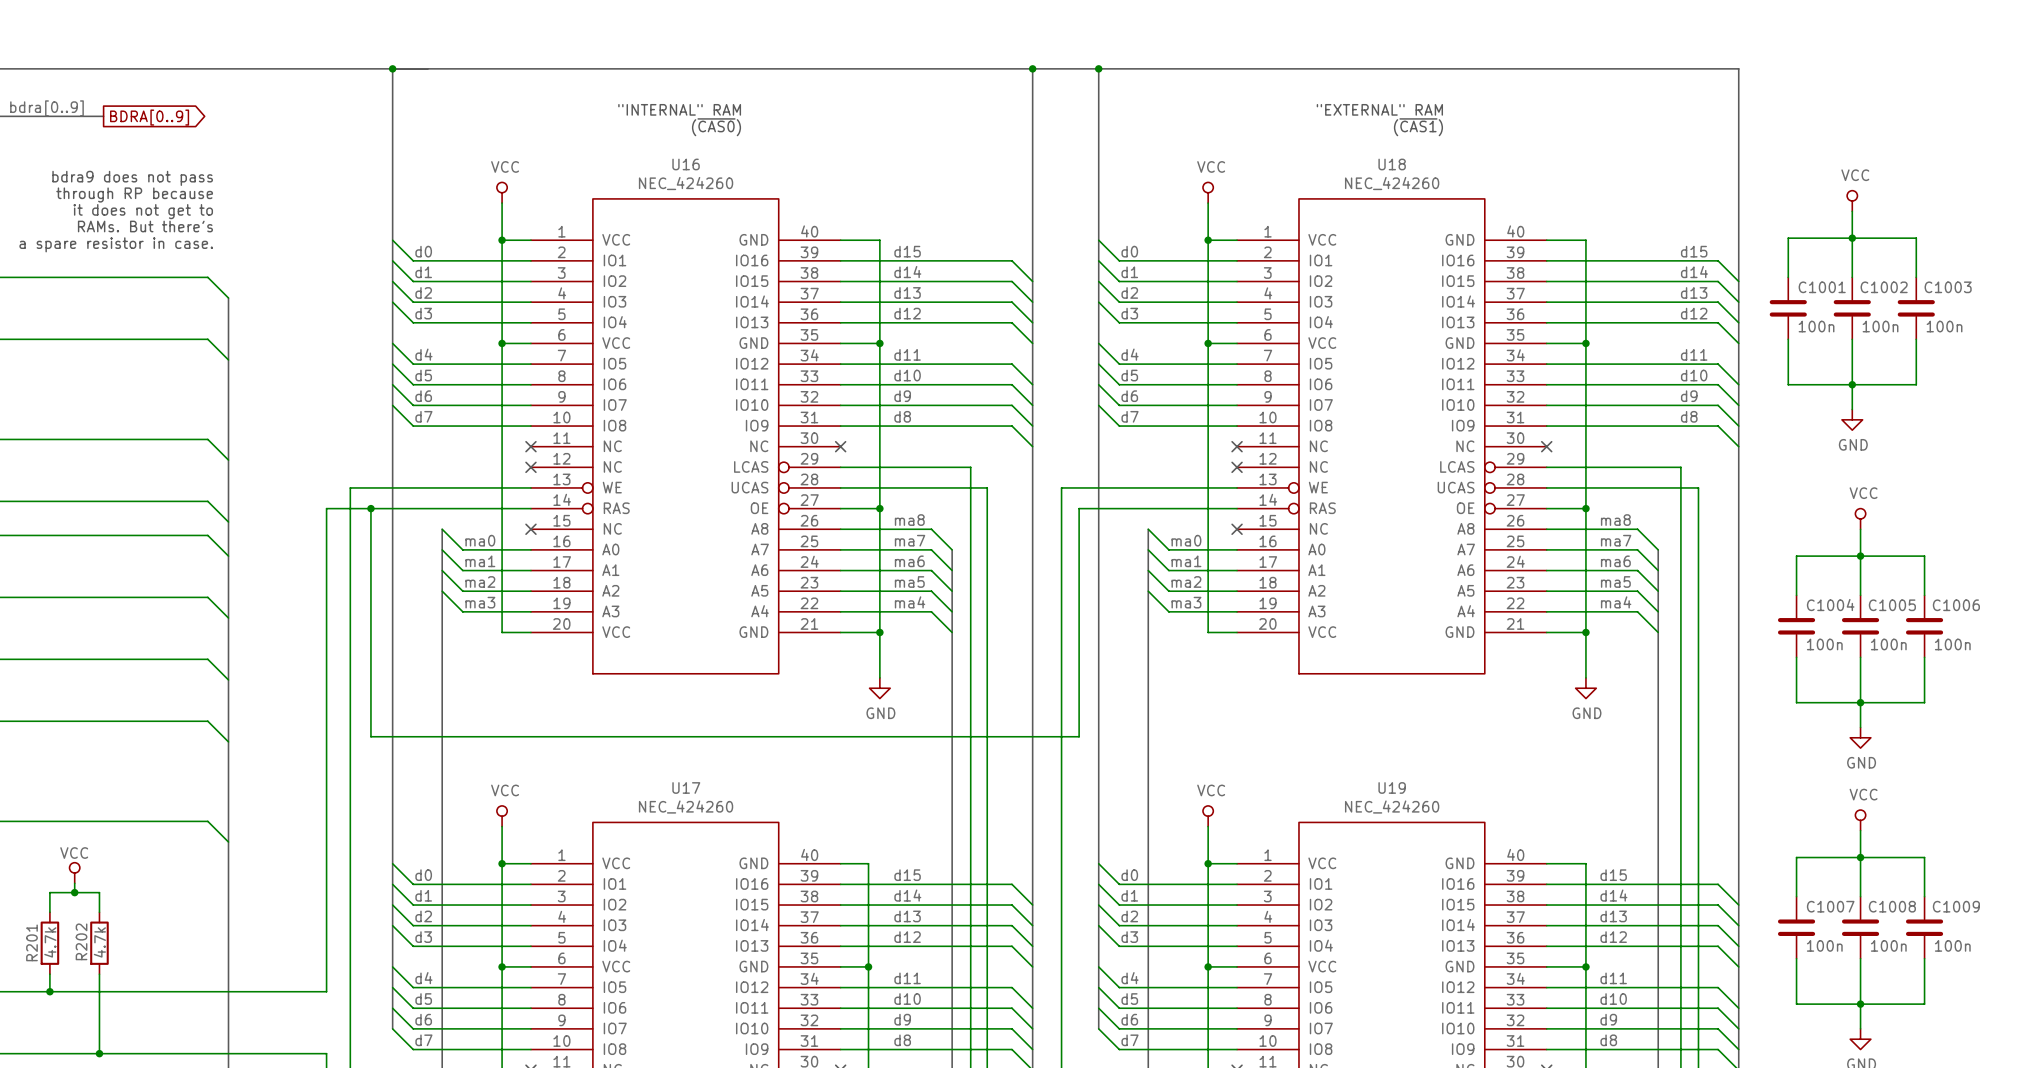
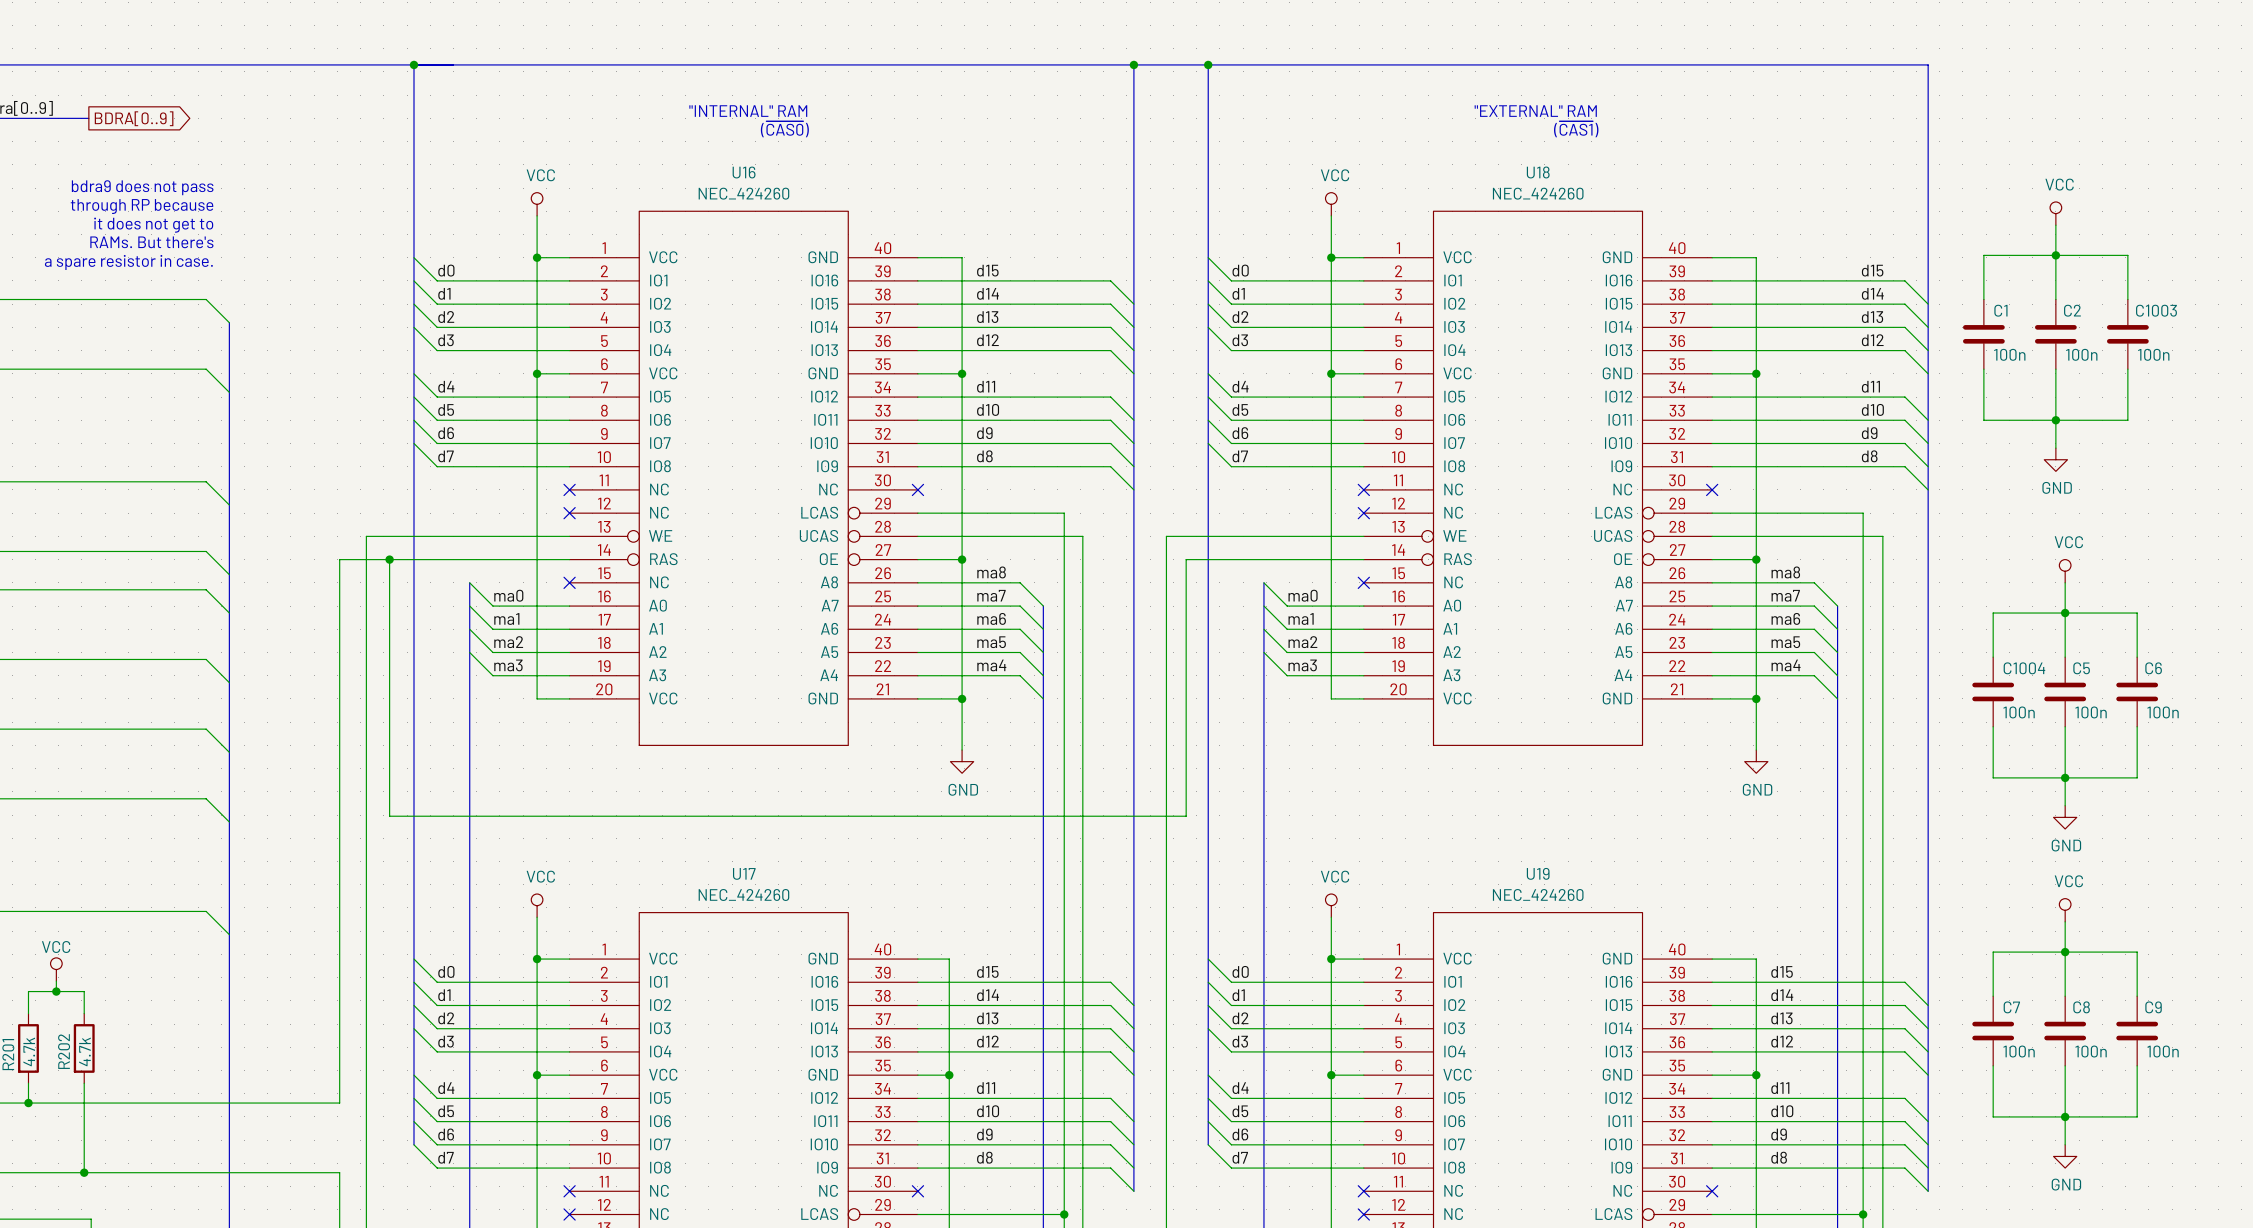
C1001 name: C1001 (1822, 287) -> C1 (2000, 310)
C1002 name: C1002 (1884, 287) -> C2 (2072, 310)
C1005 name: C1005 (1892, 605) -> C5 (2081, 668)
C1006 name: C1006 (1956, 605) -> C6 (2153, 668)
C1007 name: C1007 (1830, 906) -> C7 (2011, 1007)
C1008 name: C1008 (1892, 906) -> C8 (2081, 1007)
C1009 name: C1009 (1956, 906) -> C9 (2153, 1007)

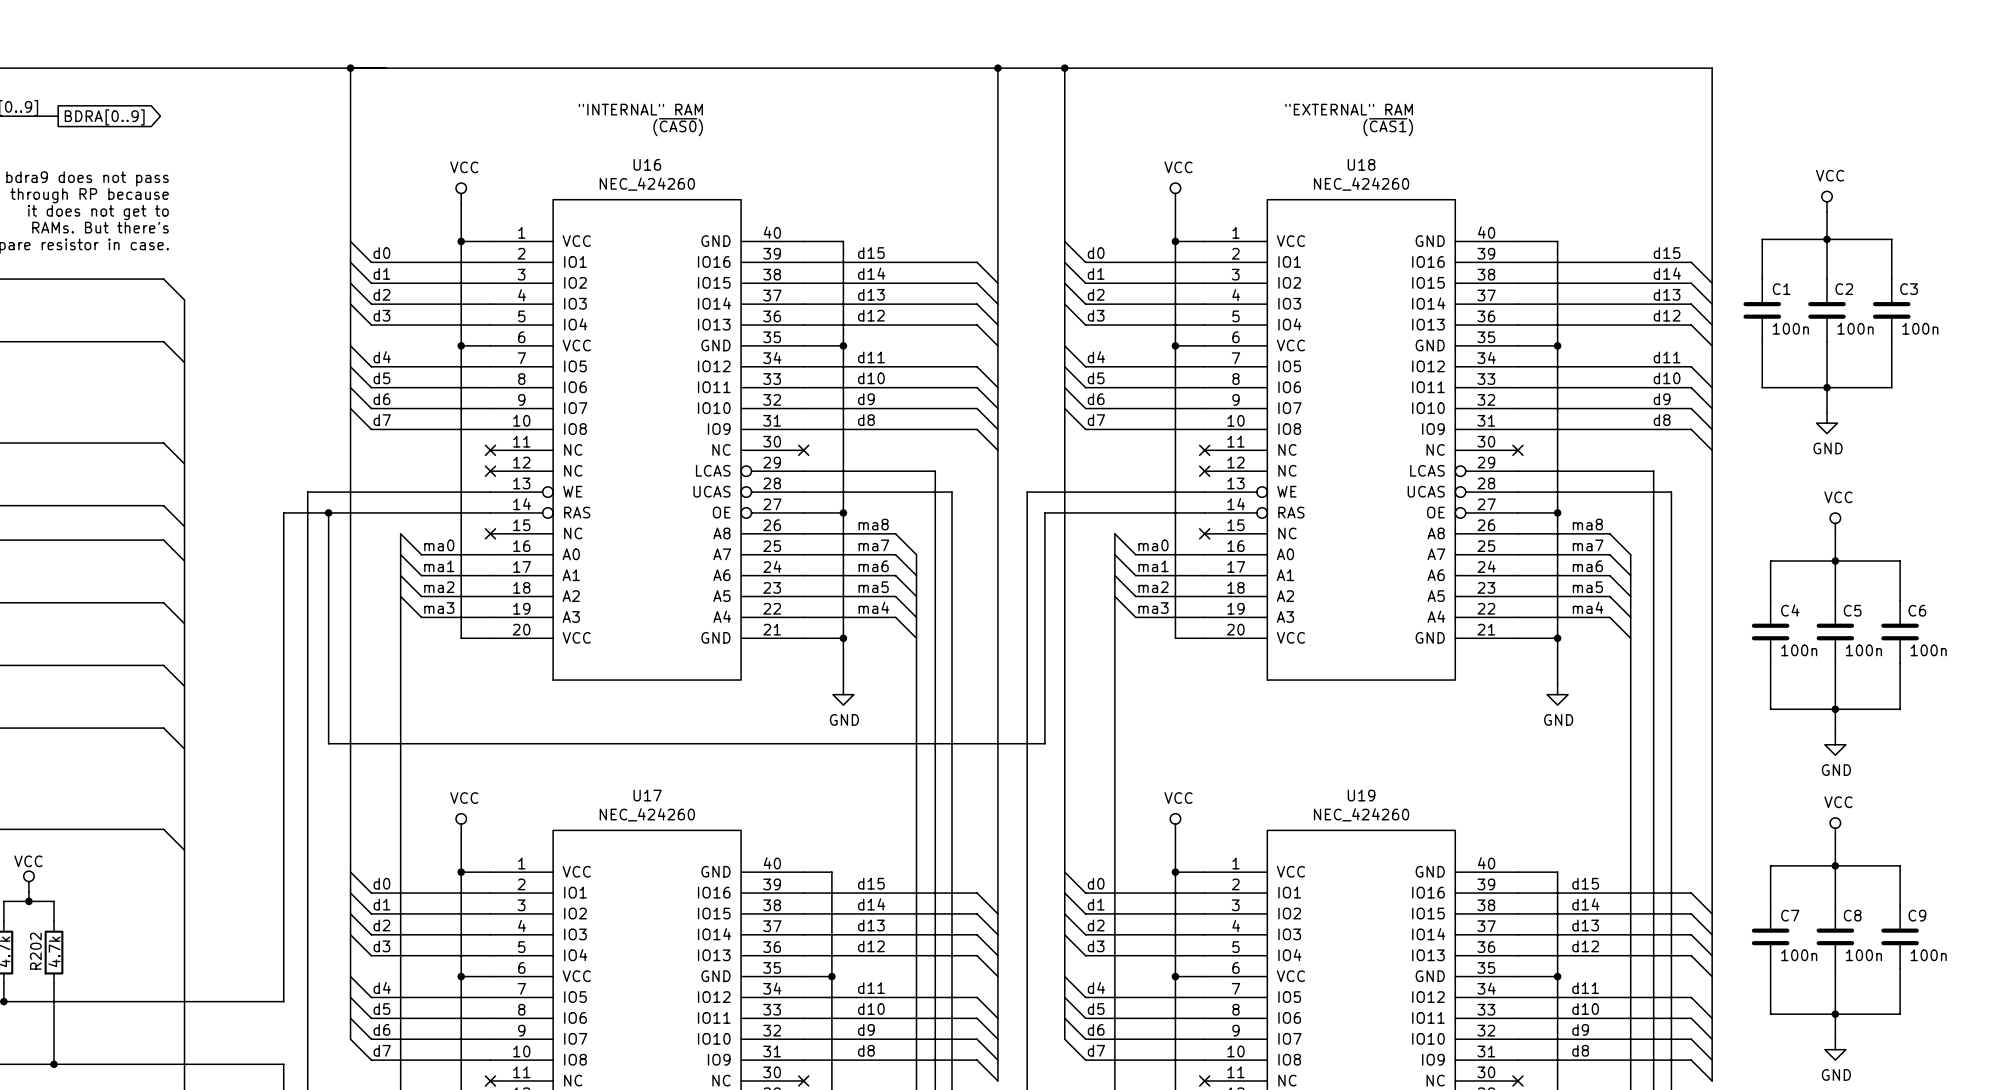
C1003 name: C1003 (2156, 310) -> C3 (1909, 289)
C1004 name: C1004 (2024, 668) -> C4 (1790, 610)

